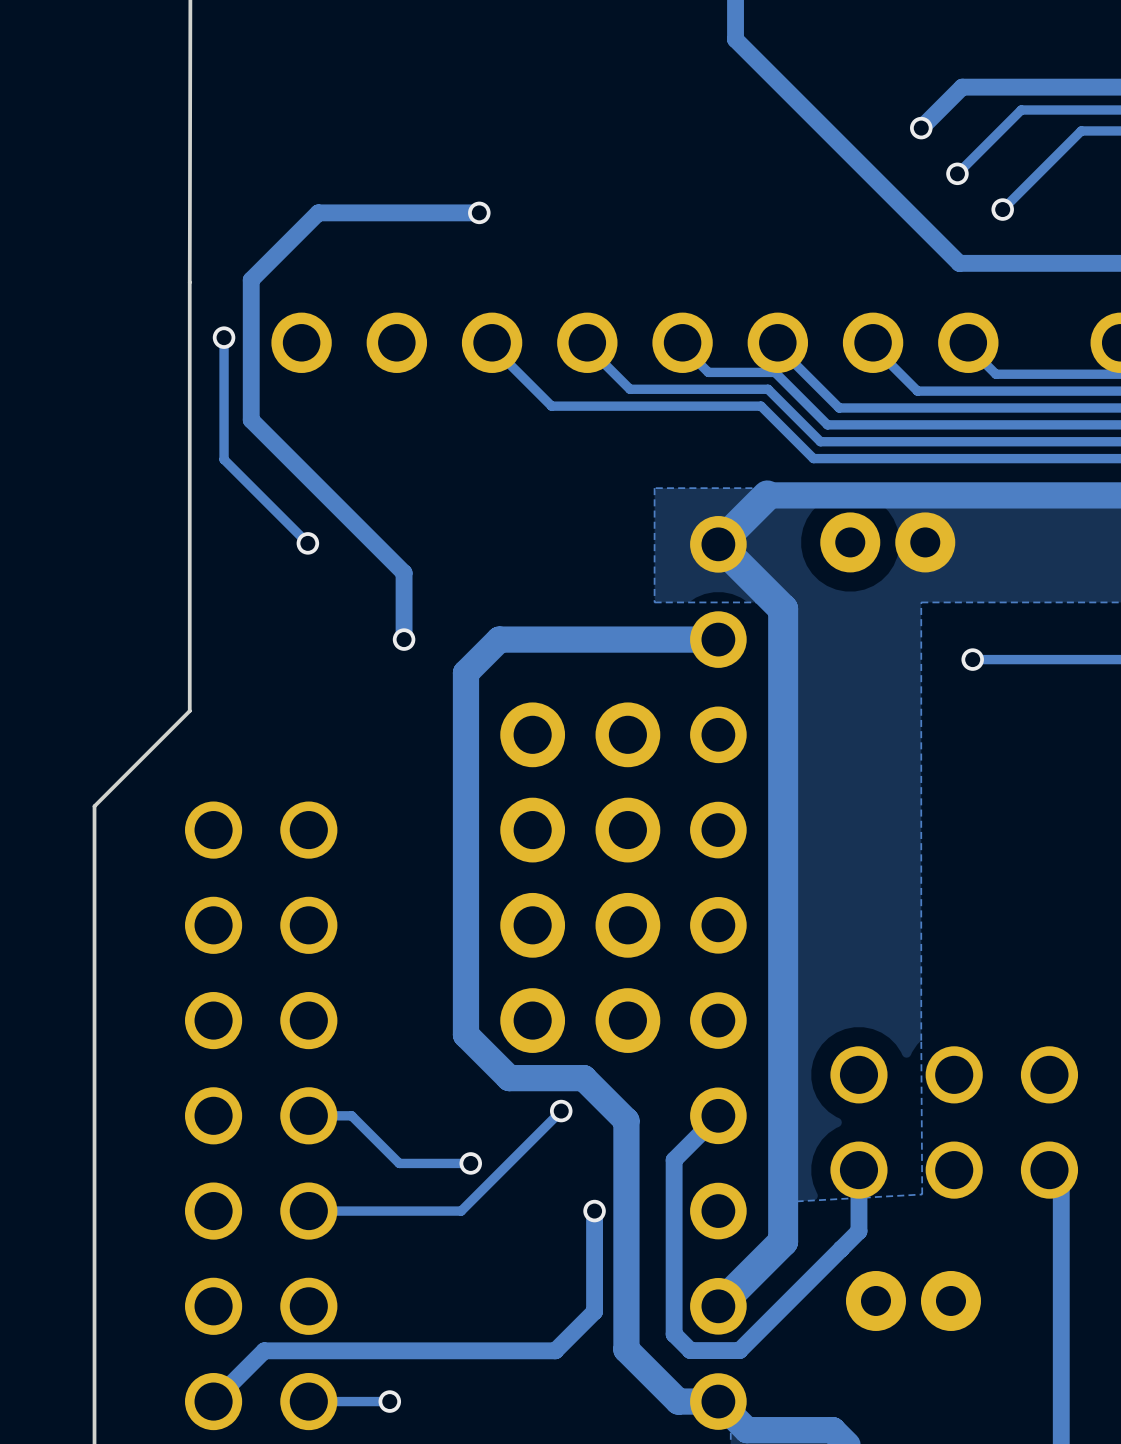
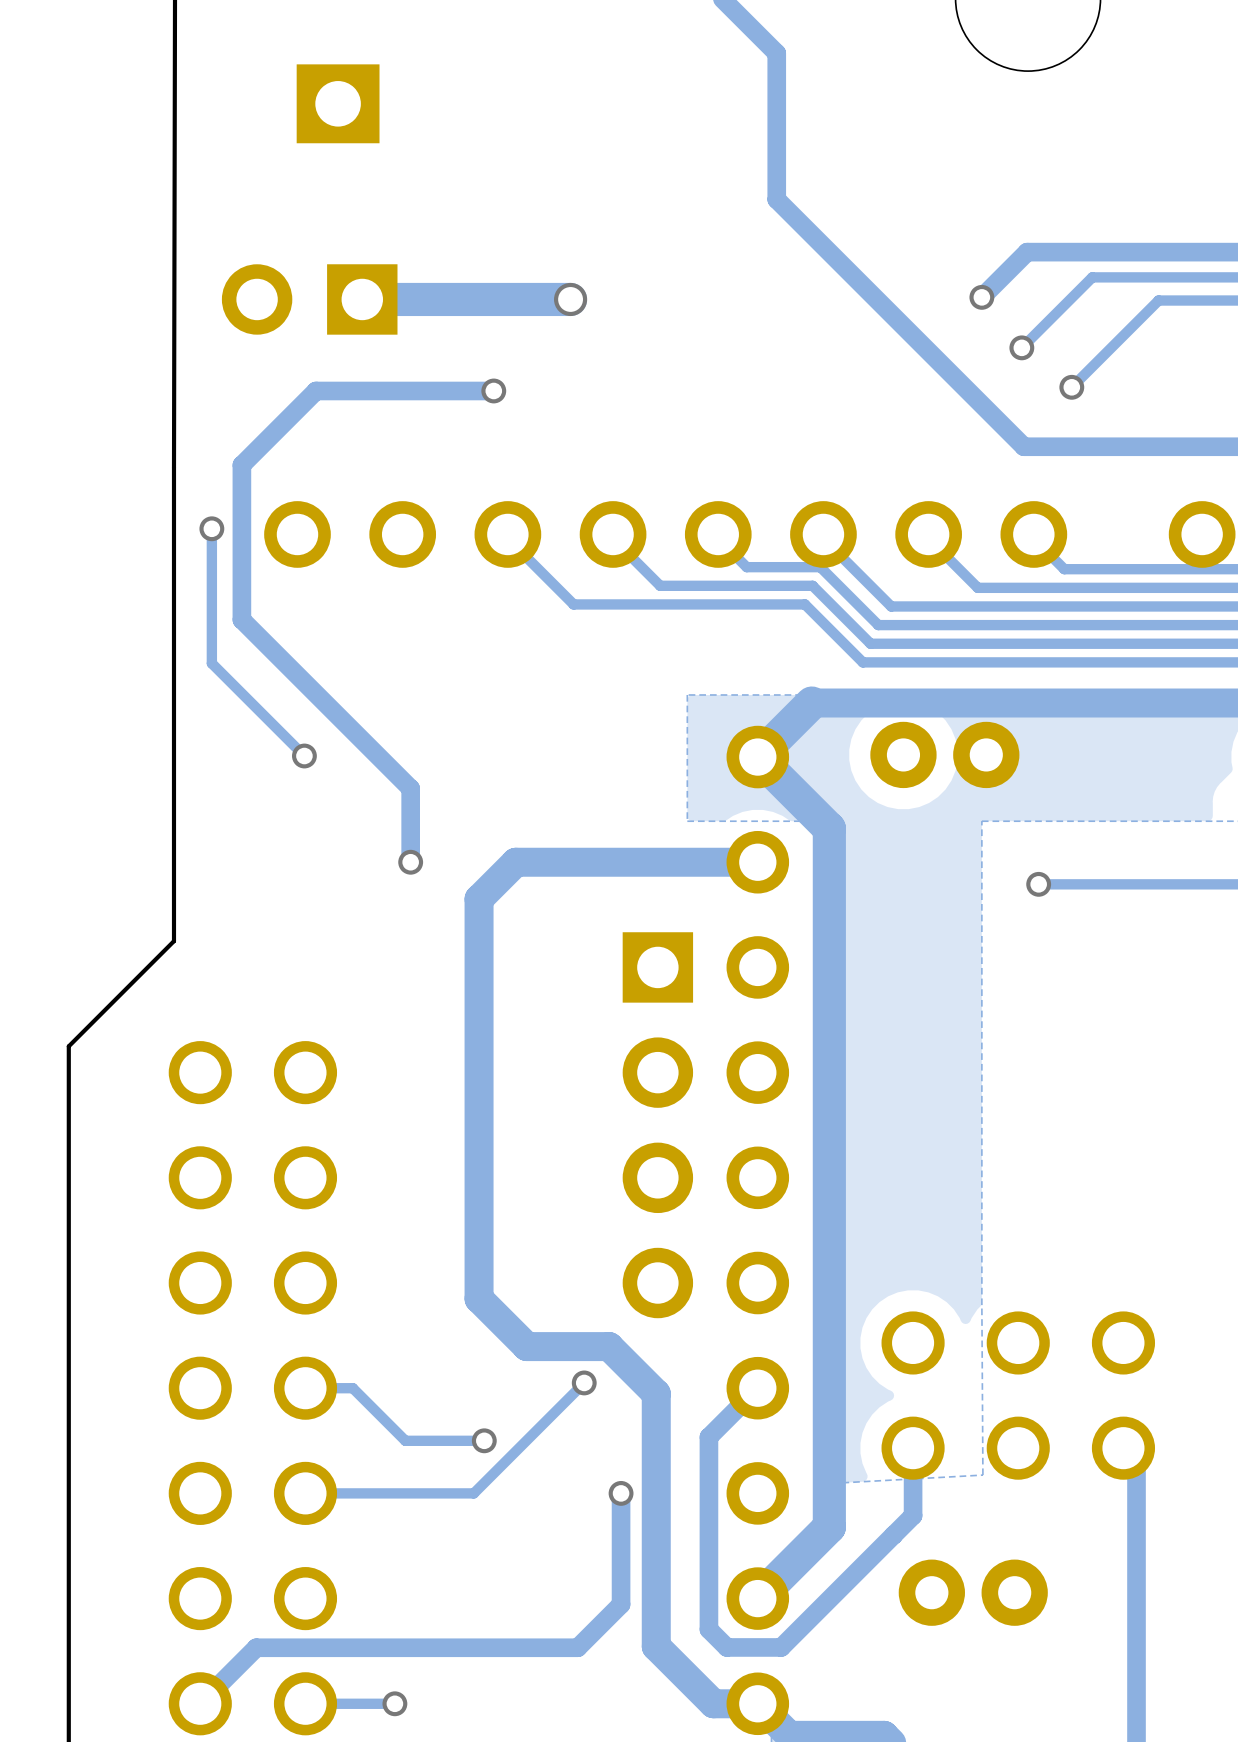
part: none -> (309, 299)
track: none -> (570, 299) (362, 299)
via: none -> (570, 299)
part: (580, 877) -> none
part: none -> (657, 1125)

